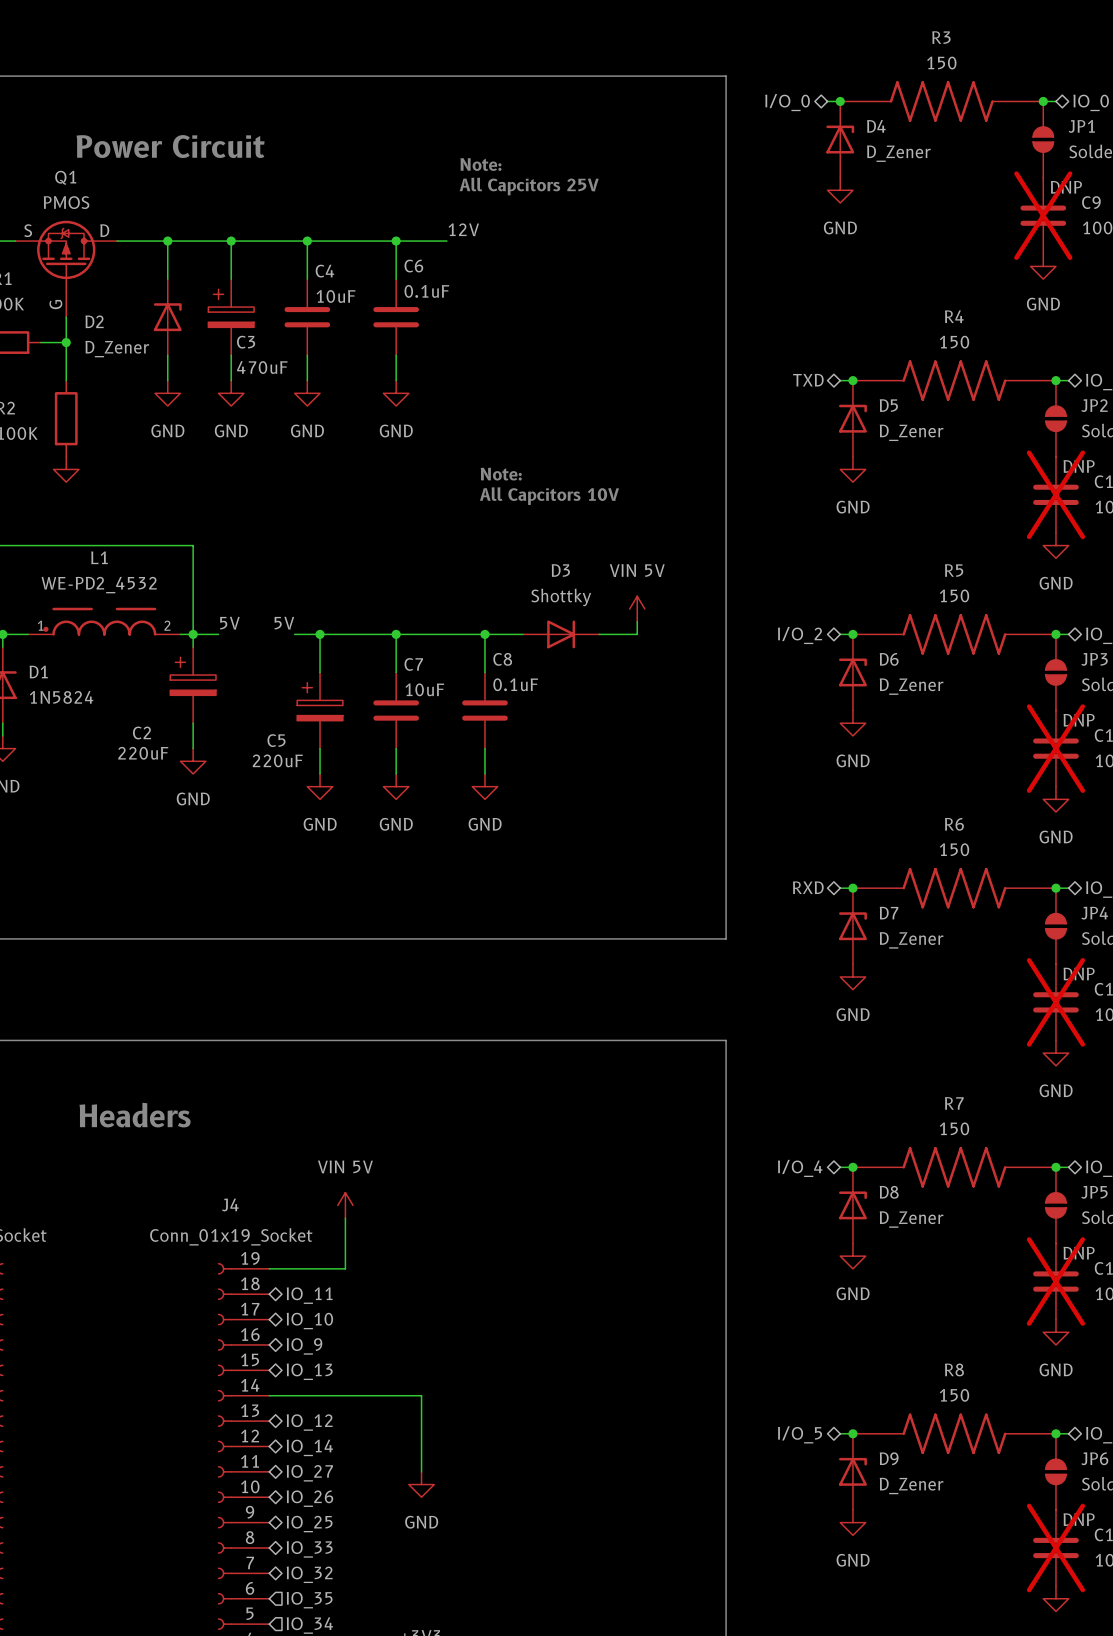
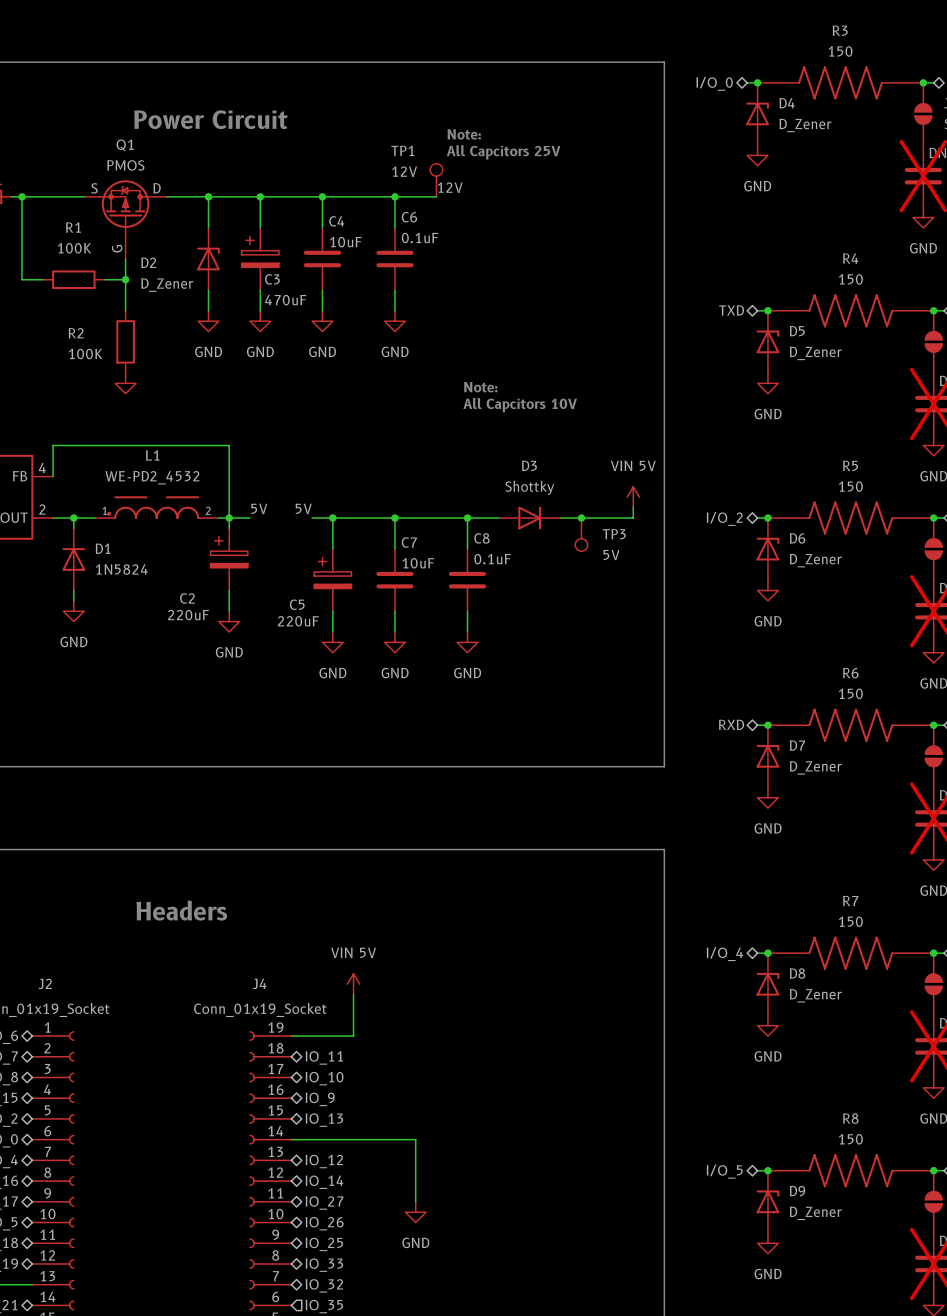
TP1: none -> 12V (436, 180)
power symbol position: VIN 5V (637, 609) -> VIN 5V (633, 497)
wire: (637, 621) (637, 634) -> (633, 507) (633, 518) (591, 518)
junction: none -> (581, 518)
TP3: none -> 5V (581, 534)

